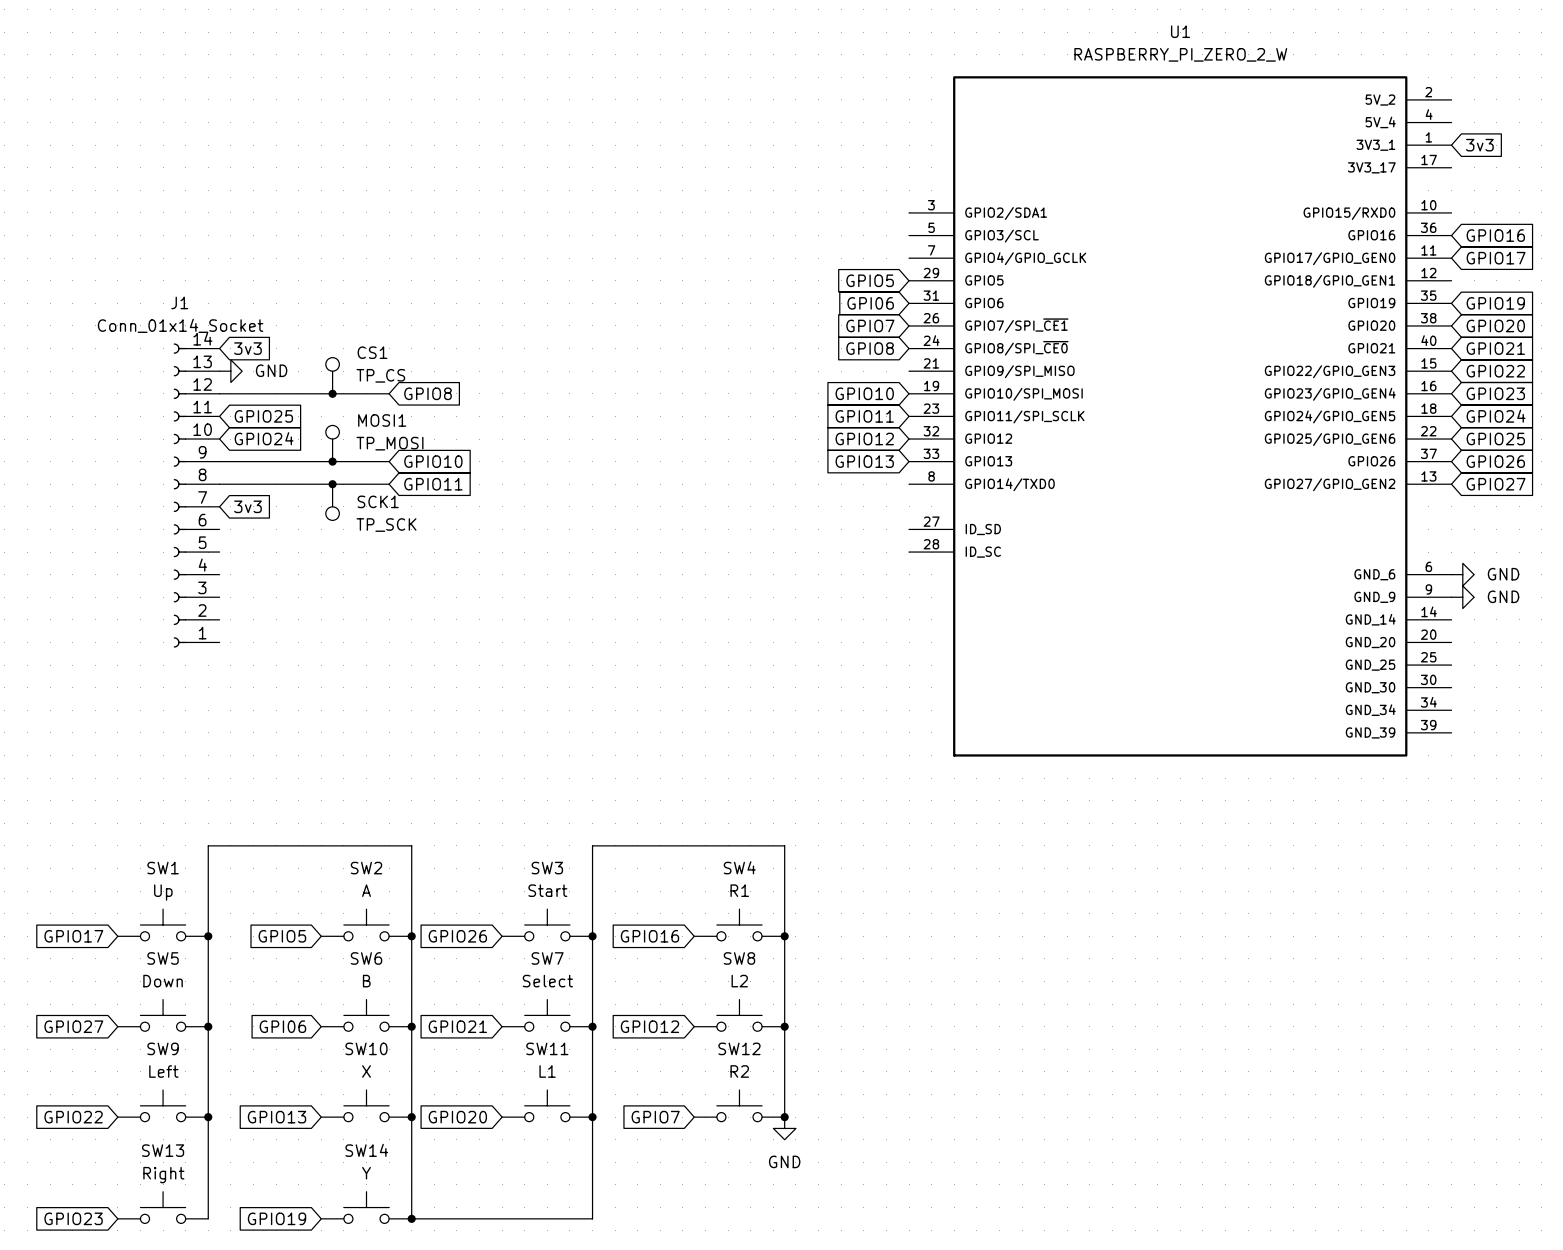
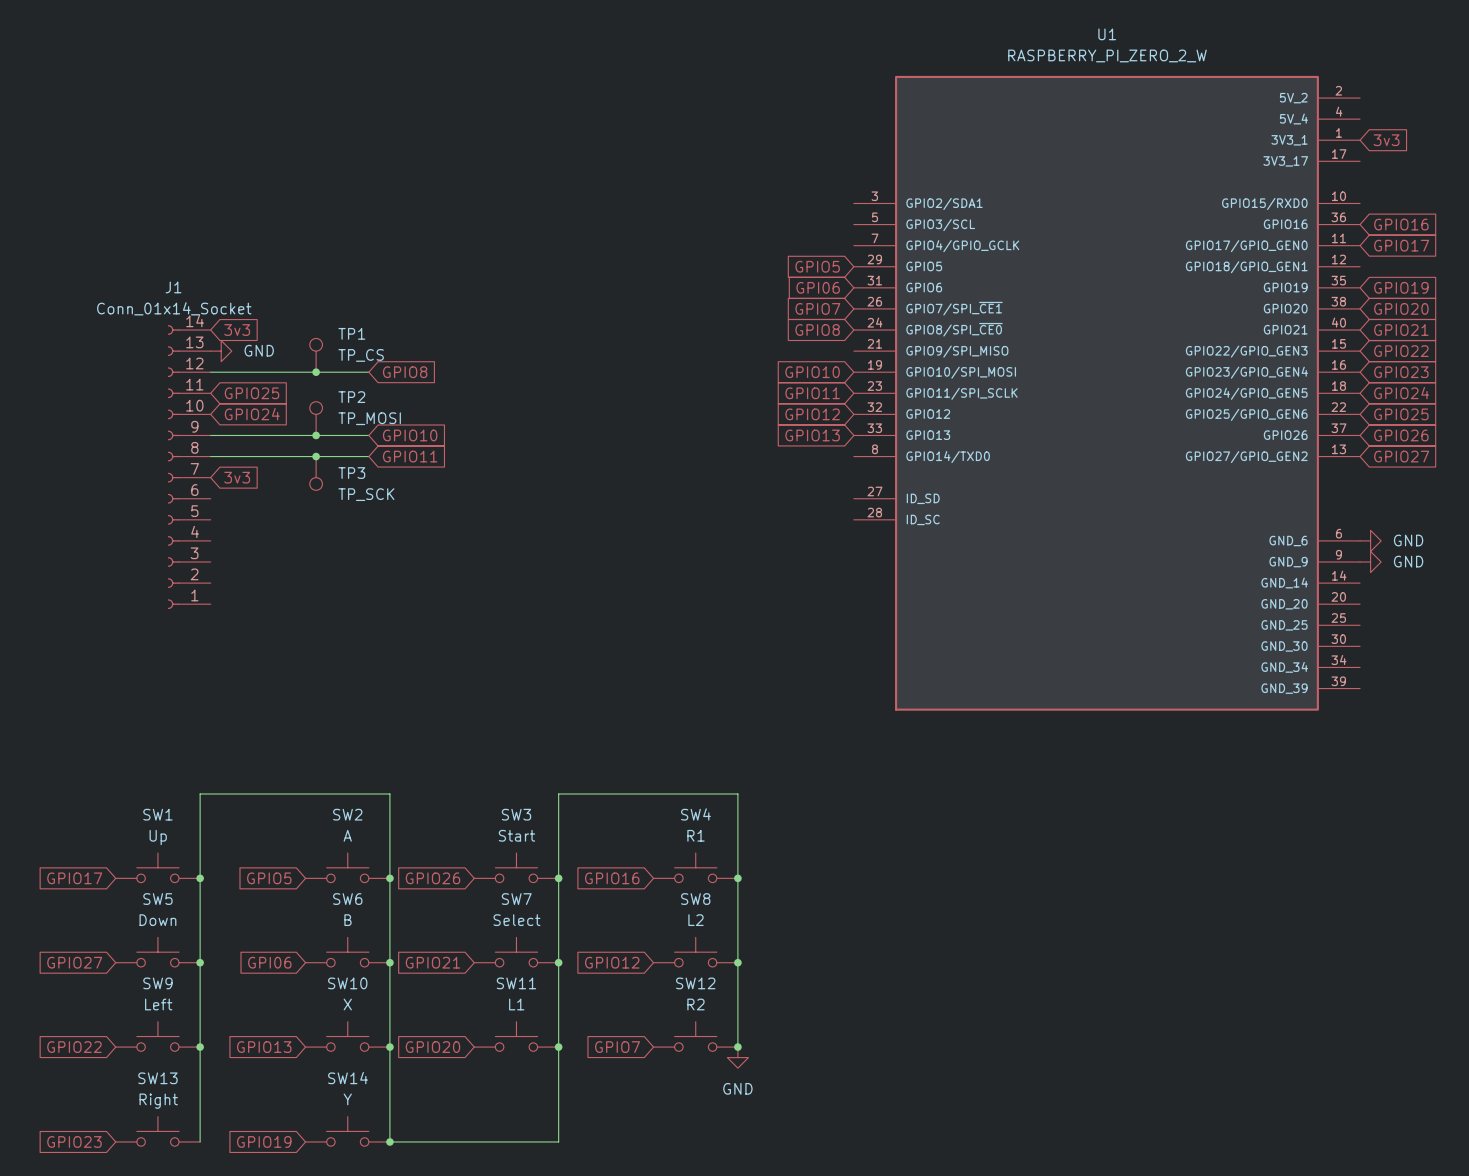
CS1 name: CS1 (372, 352) -> TP1 (351, 333)
MOSI1 name: MOSI1 (382, 420) -> TP2 (351, 397)
SCK1 name: SCK1 (378, 501) -> TP3 (351, 473)

